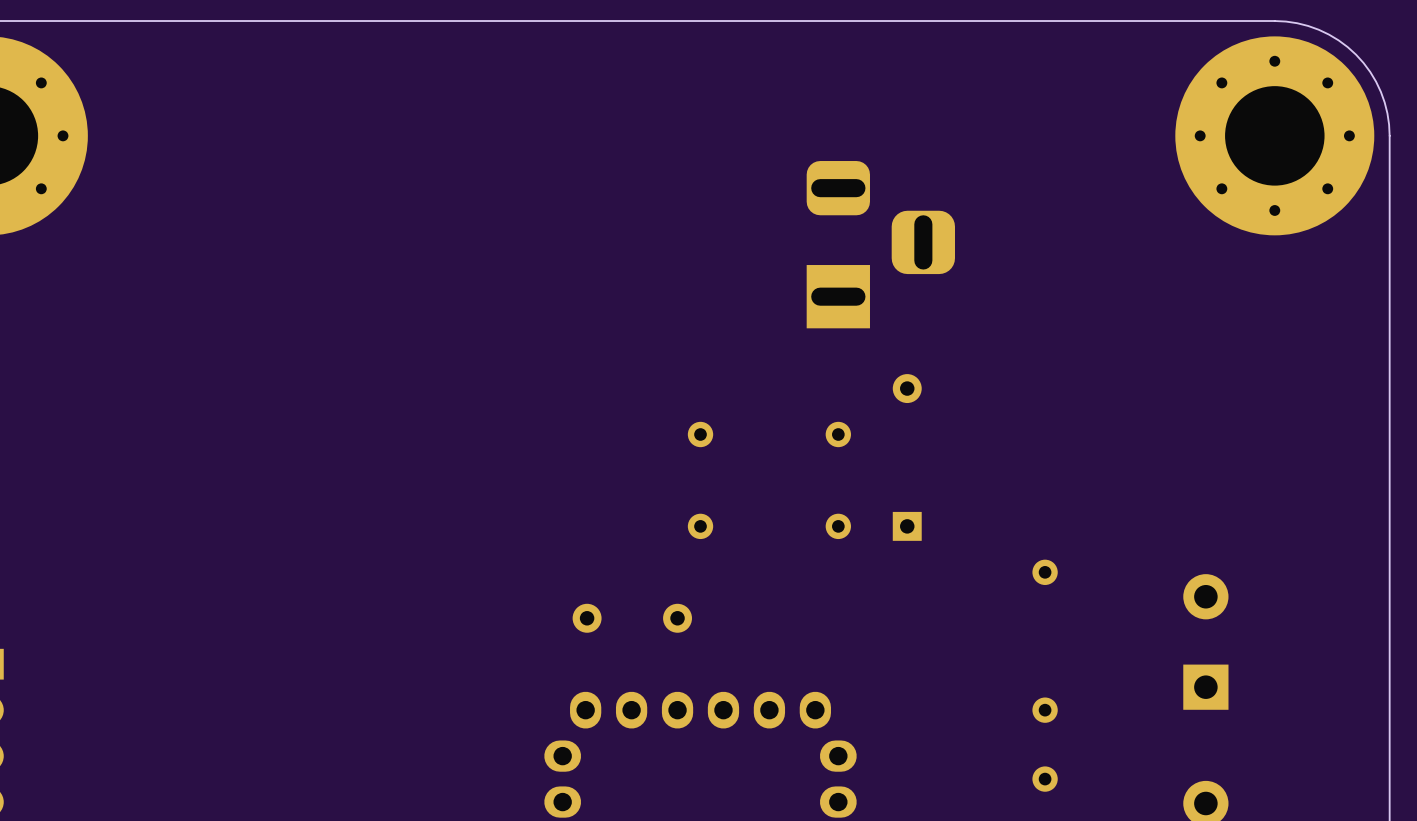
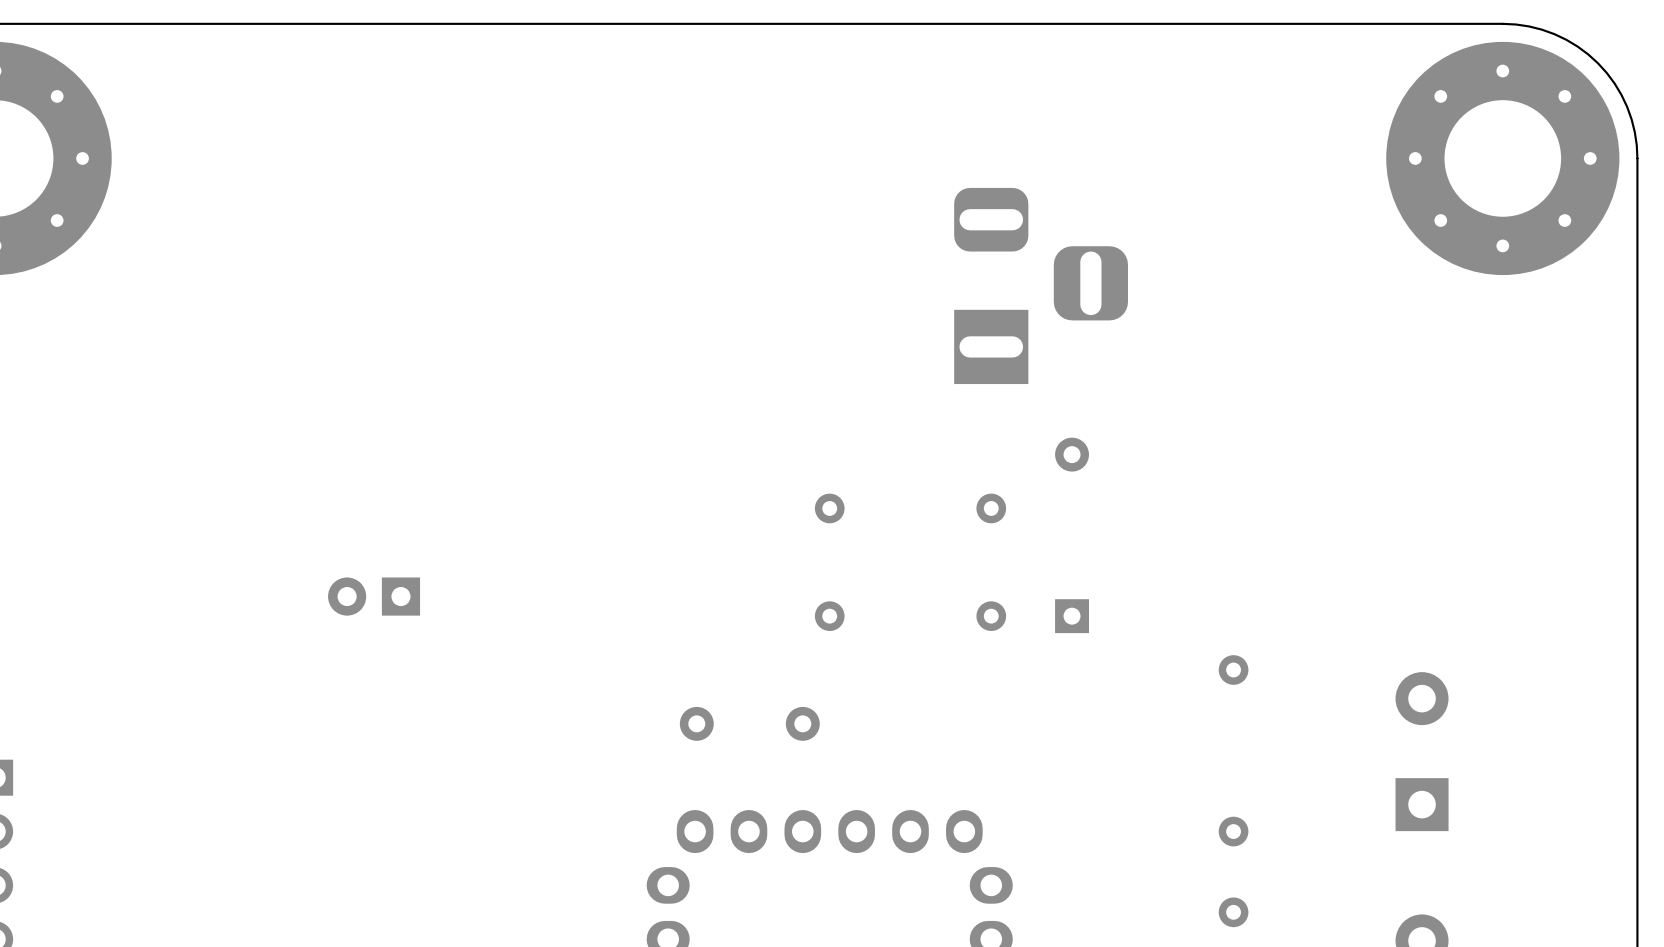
part: none -> (374, 596)

